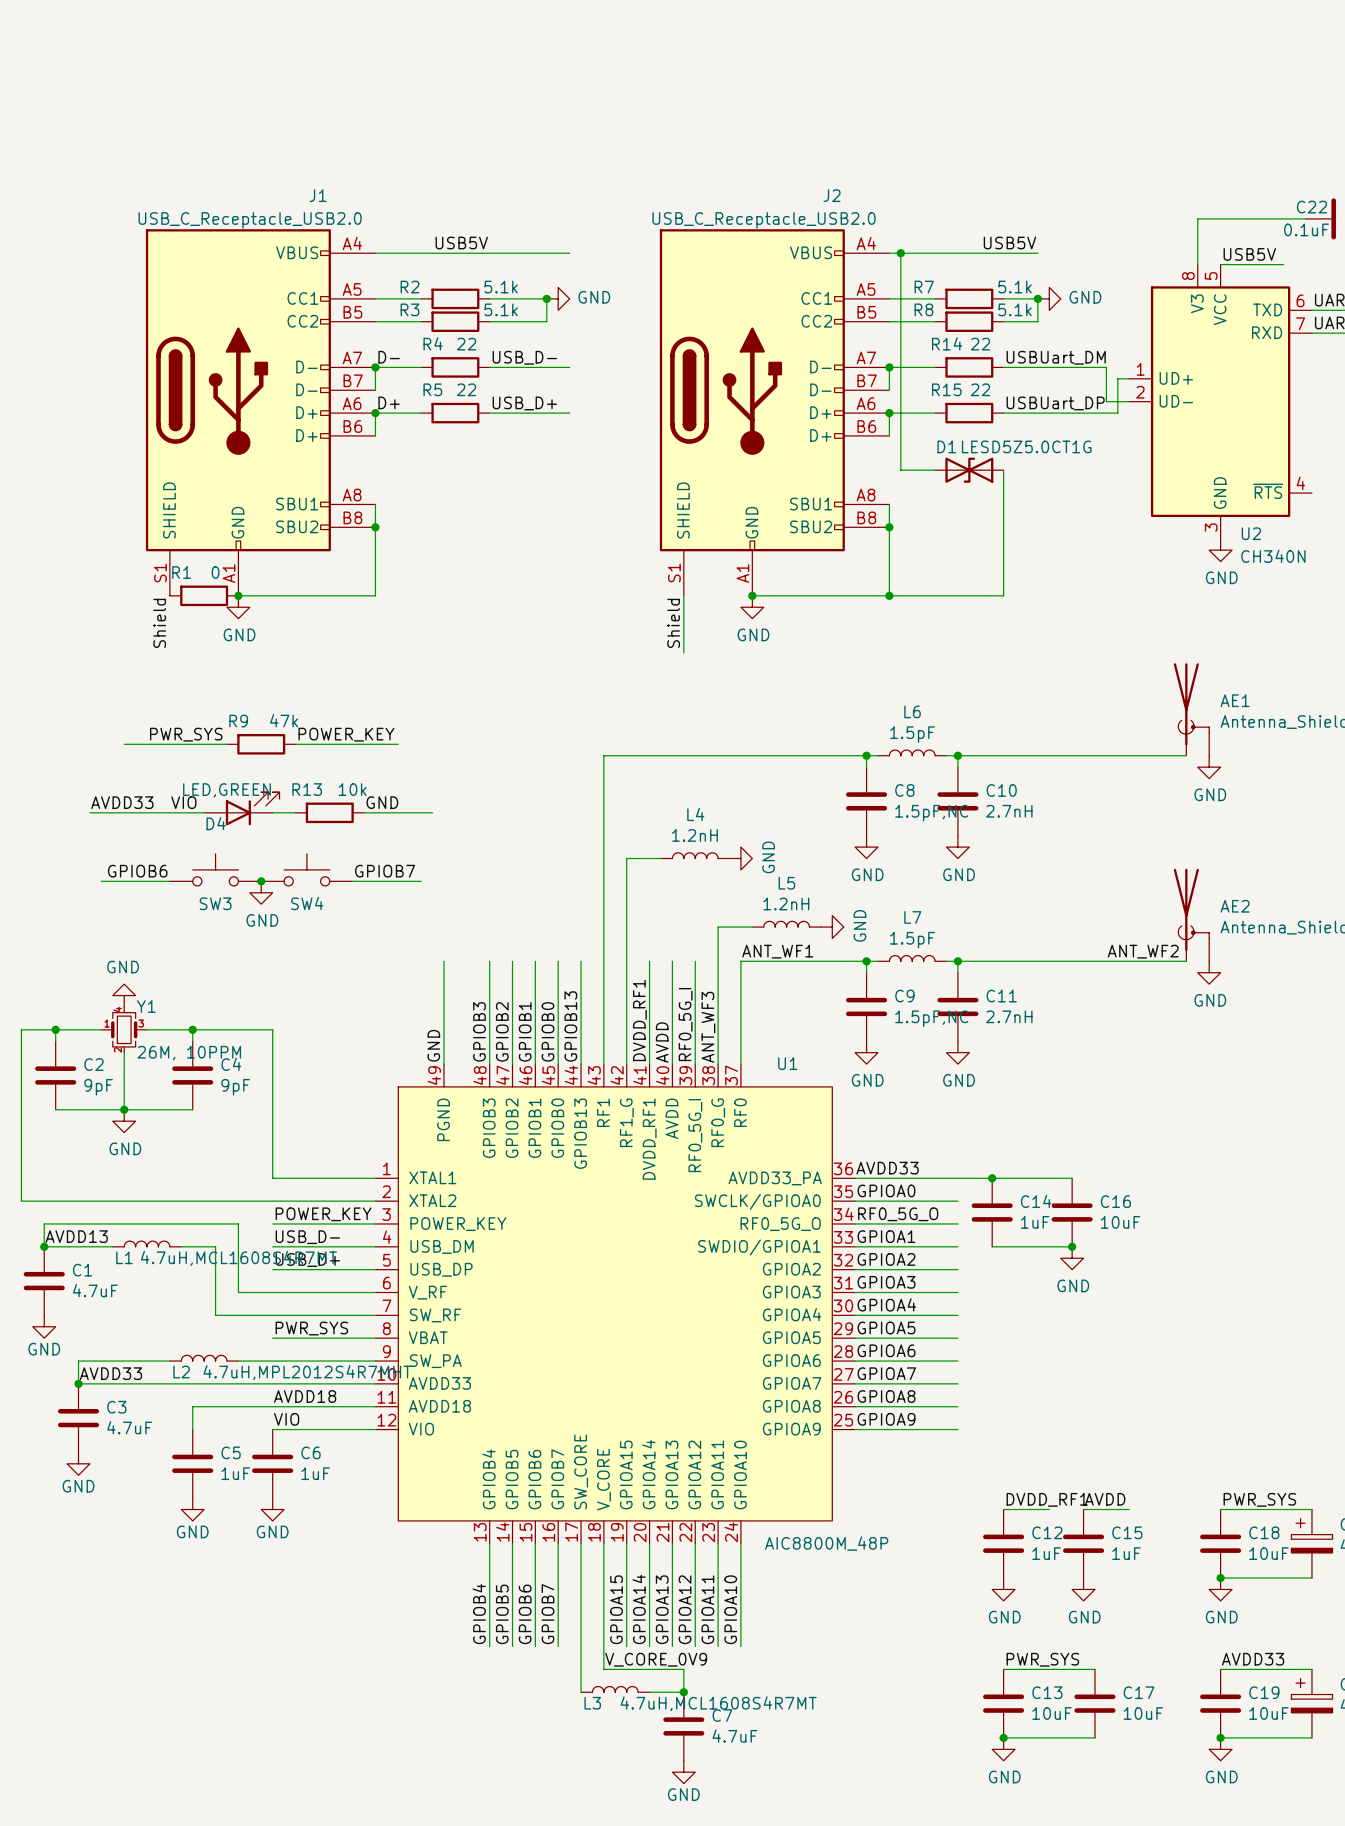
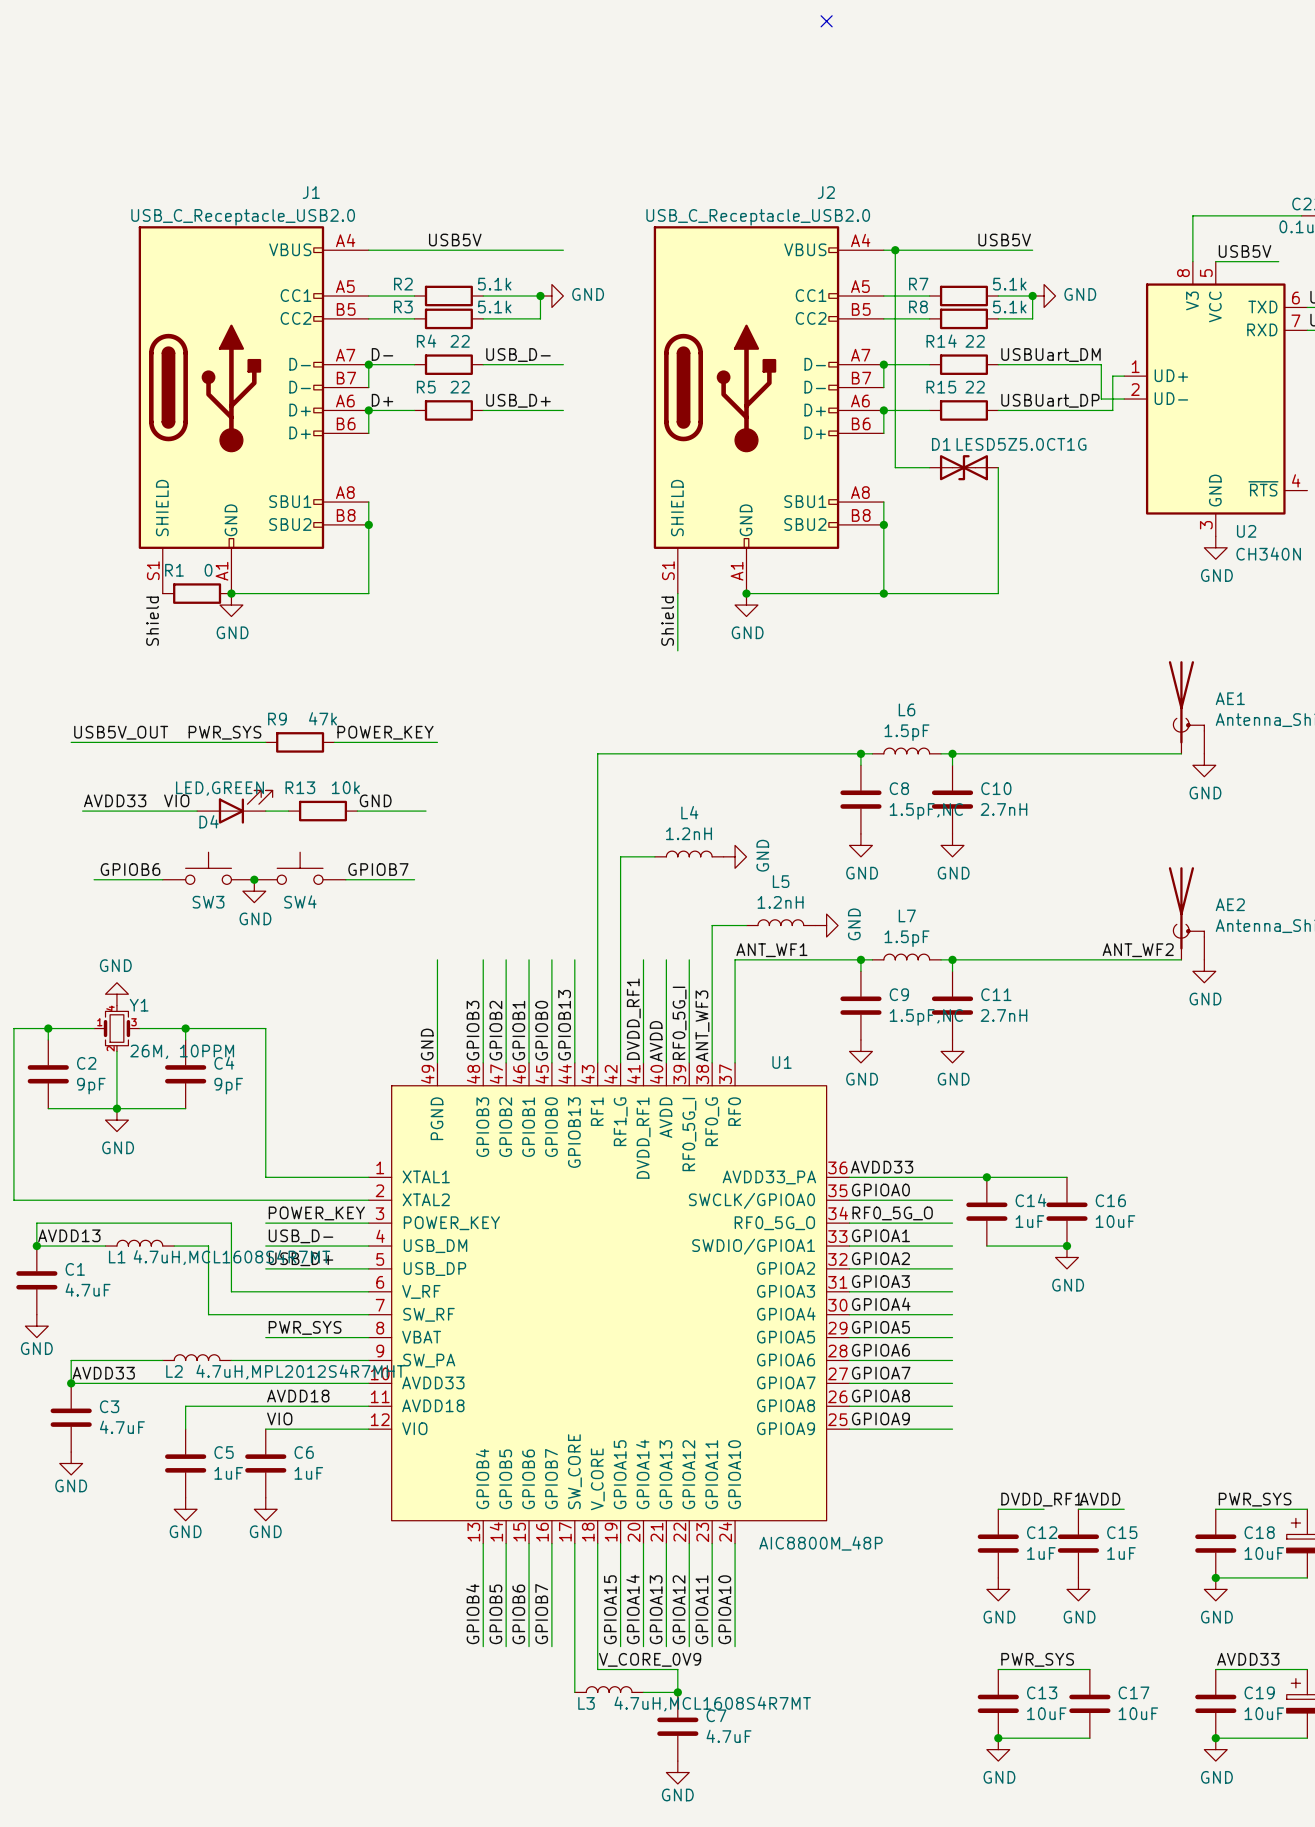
no-connect mark: none -> (826, 21)
label: none -> USB5V_OUT (121, 732)
label position: PWR_SYS (186, 734) -> PWR_SYS (224, 732)
label position: POWER_KEY (346, 734) -> POWER_KEY (385, 732)
wire: none -> (71, 742) (116, 742)
R9 position: (261, 744) -> (300, 742)
wire: (295, 744) (341, 744) -> (219, 742) (265, 742)
wire: none -> (391, 742) (437, 742)

